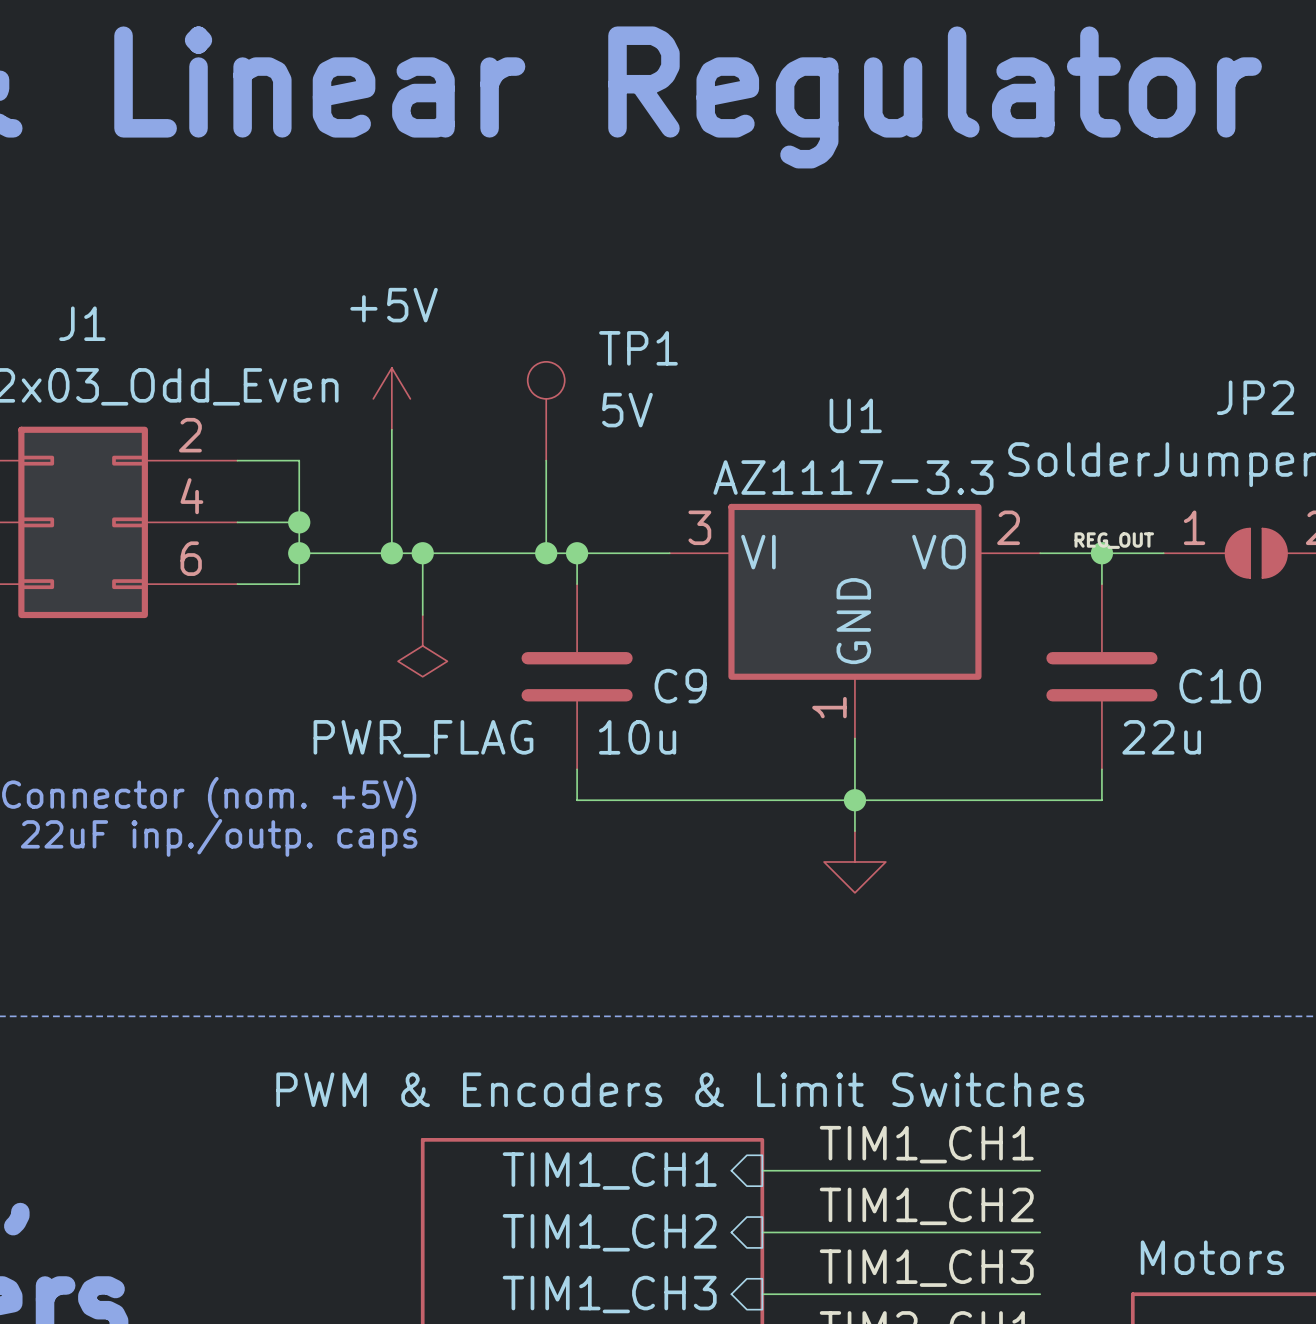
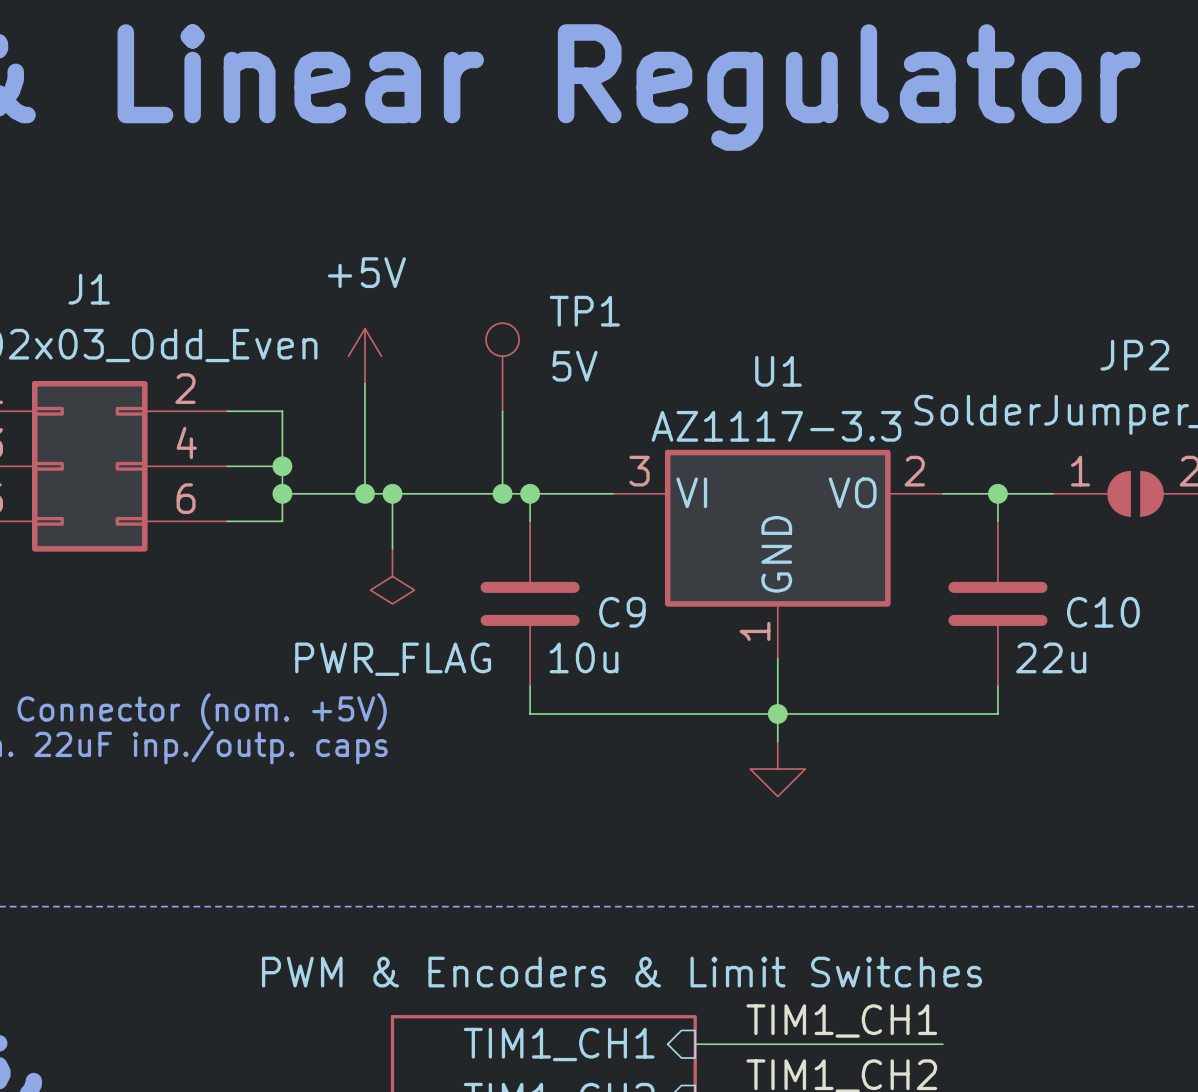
label: REG_OUT (1114, 540) -> none

